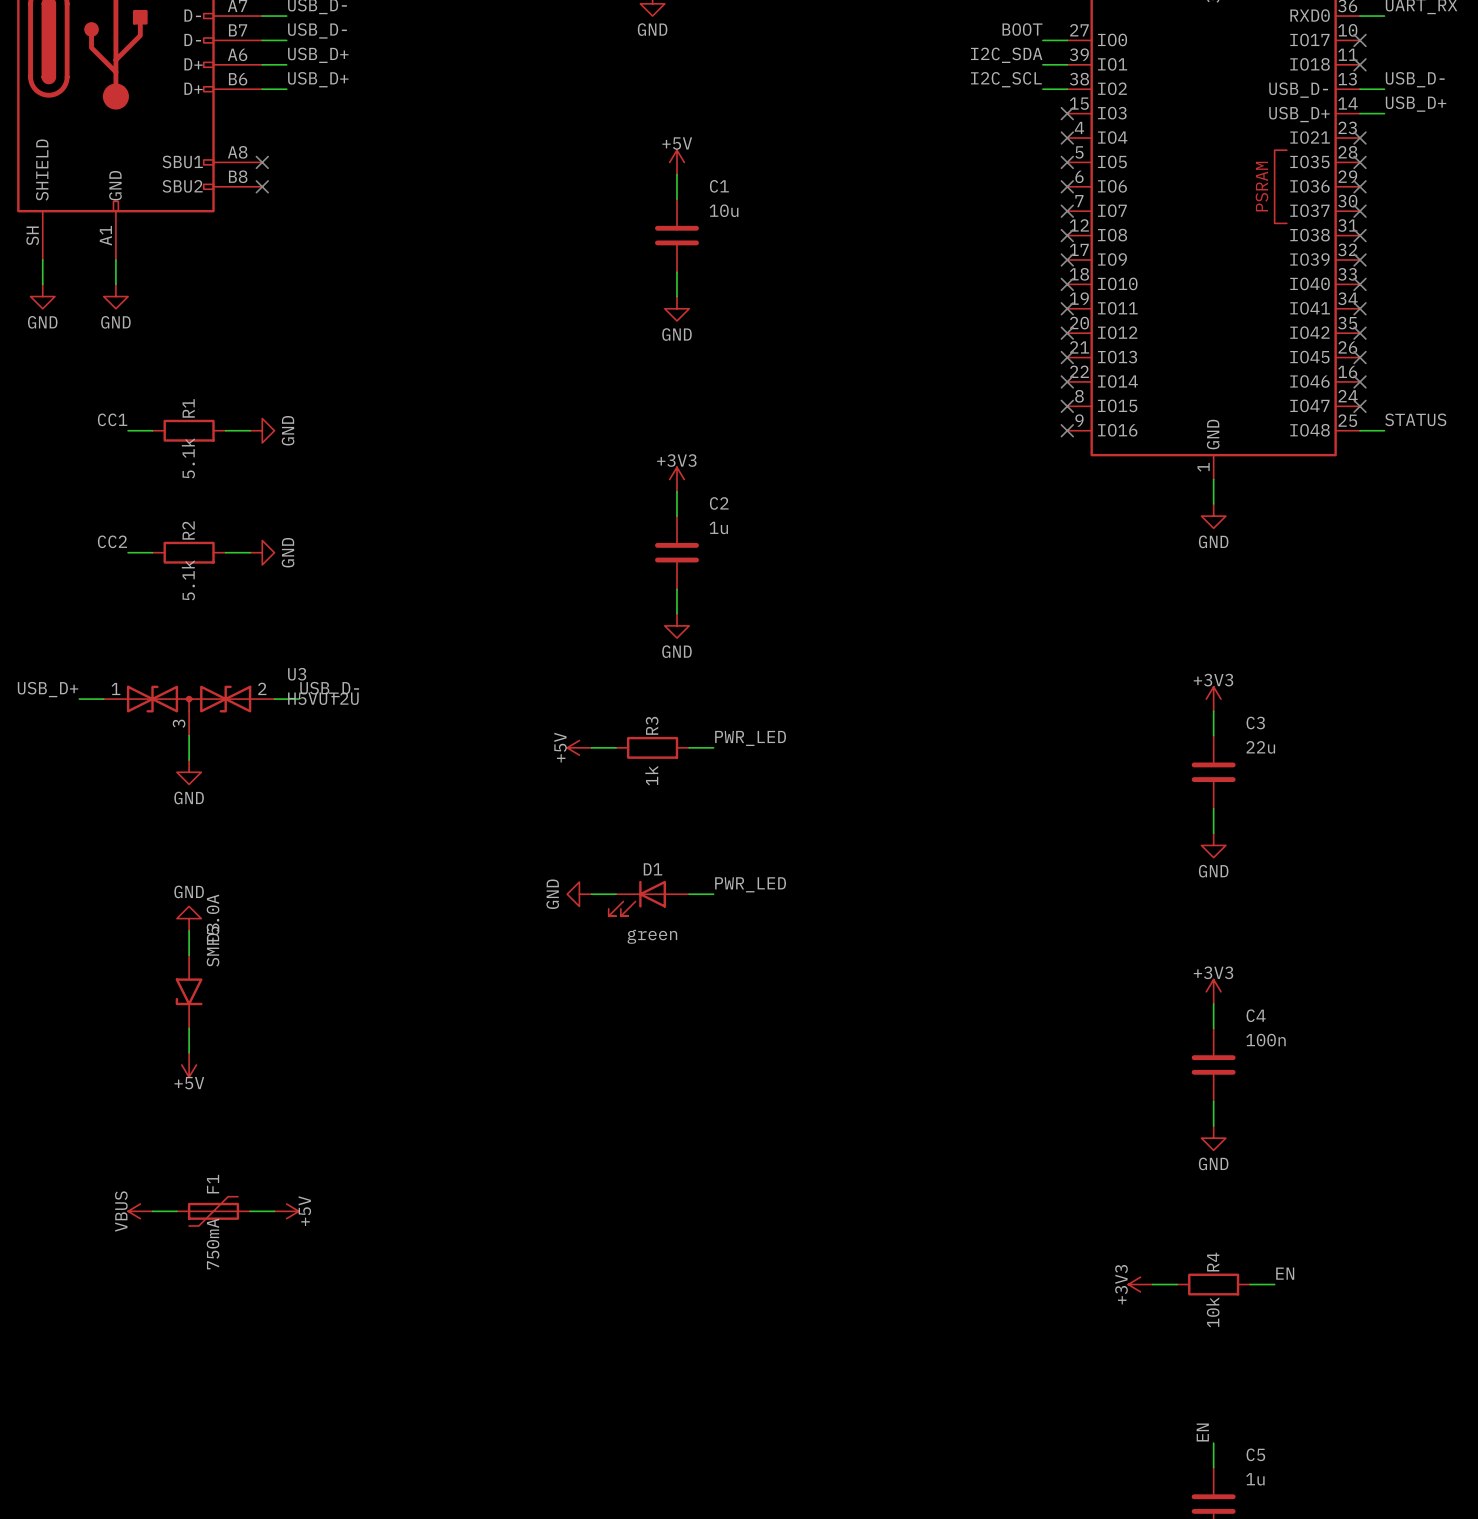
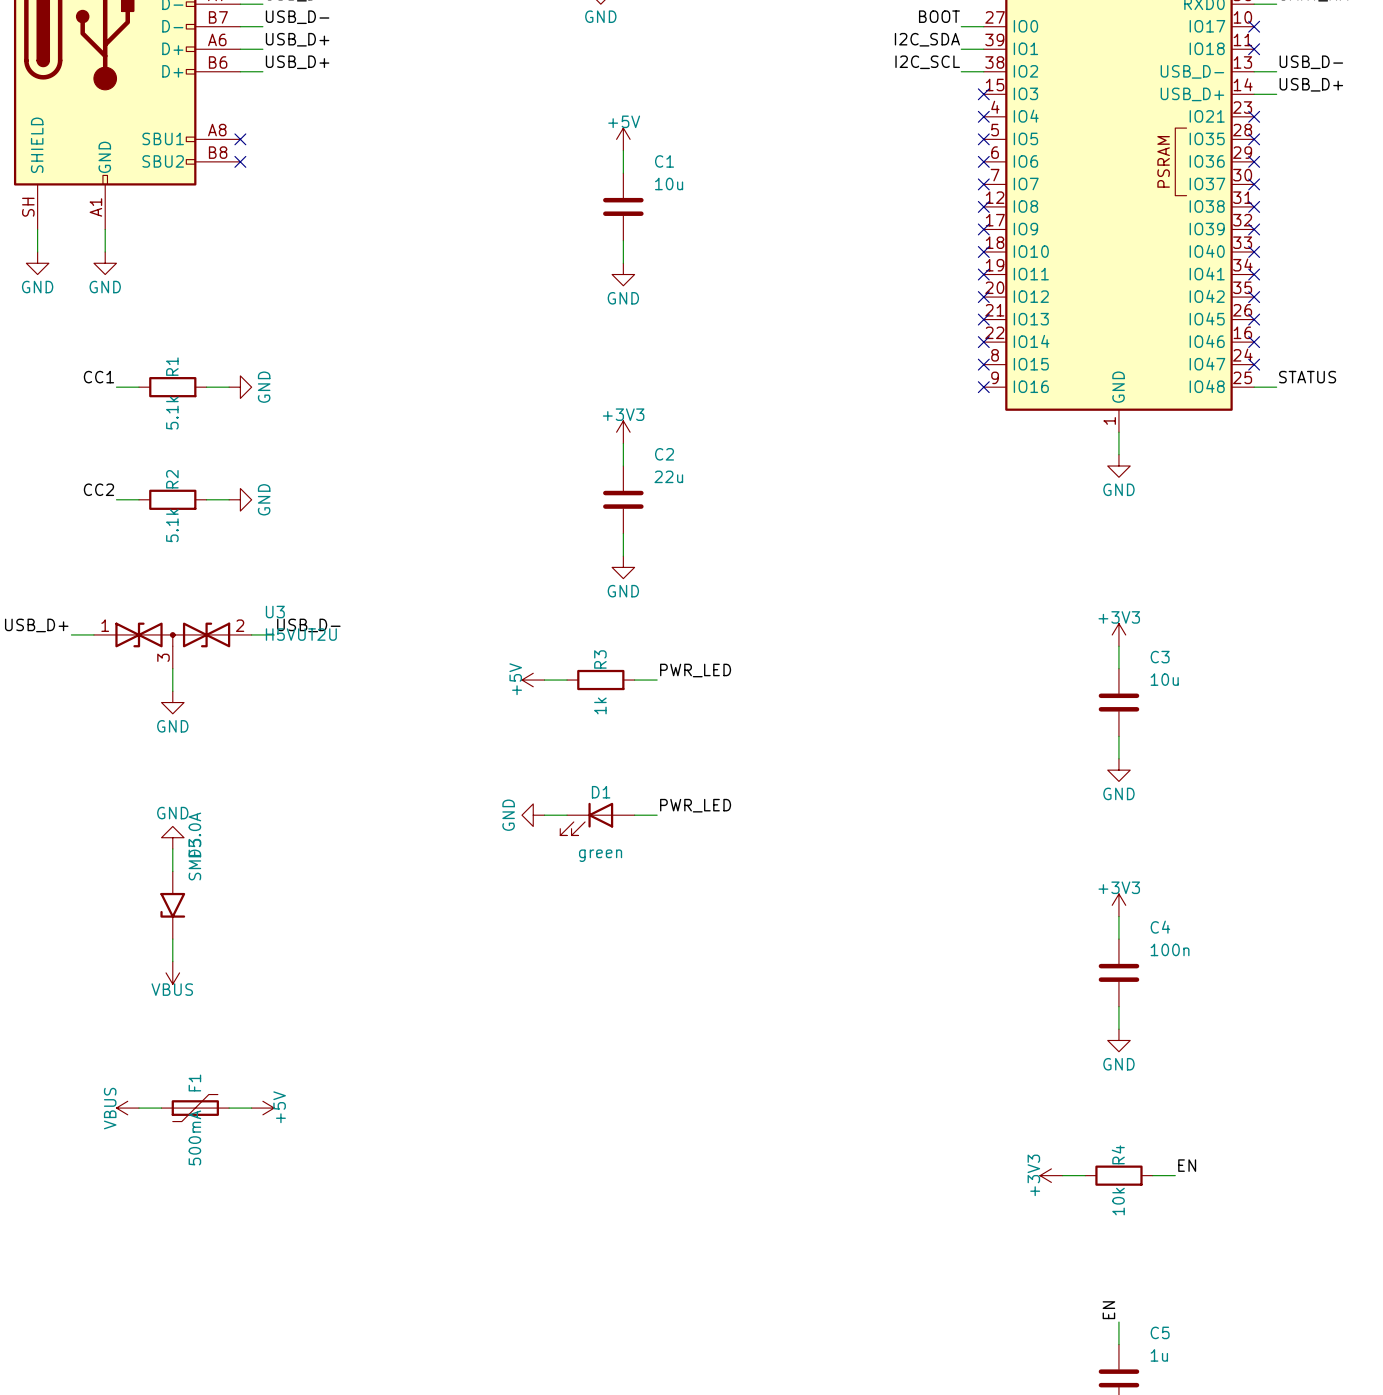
C2 value: 1u (718, 527) -> 22u (668, 476)
C3 value: 22u (1260, 747) -> 10u (1164, 679)
power symbol: +5V (189, 1064) -> VBUS (172, 972)
F1 value: 750mA (213, 1243) -> 500mA (194, 1137)

